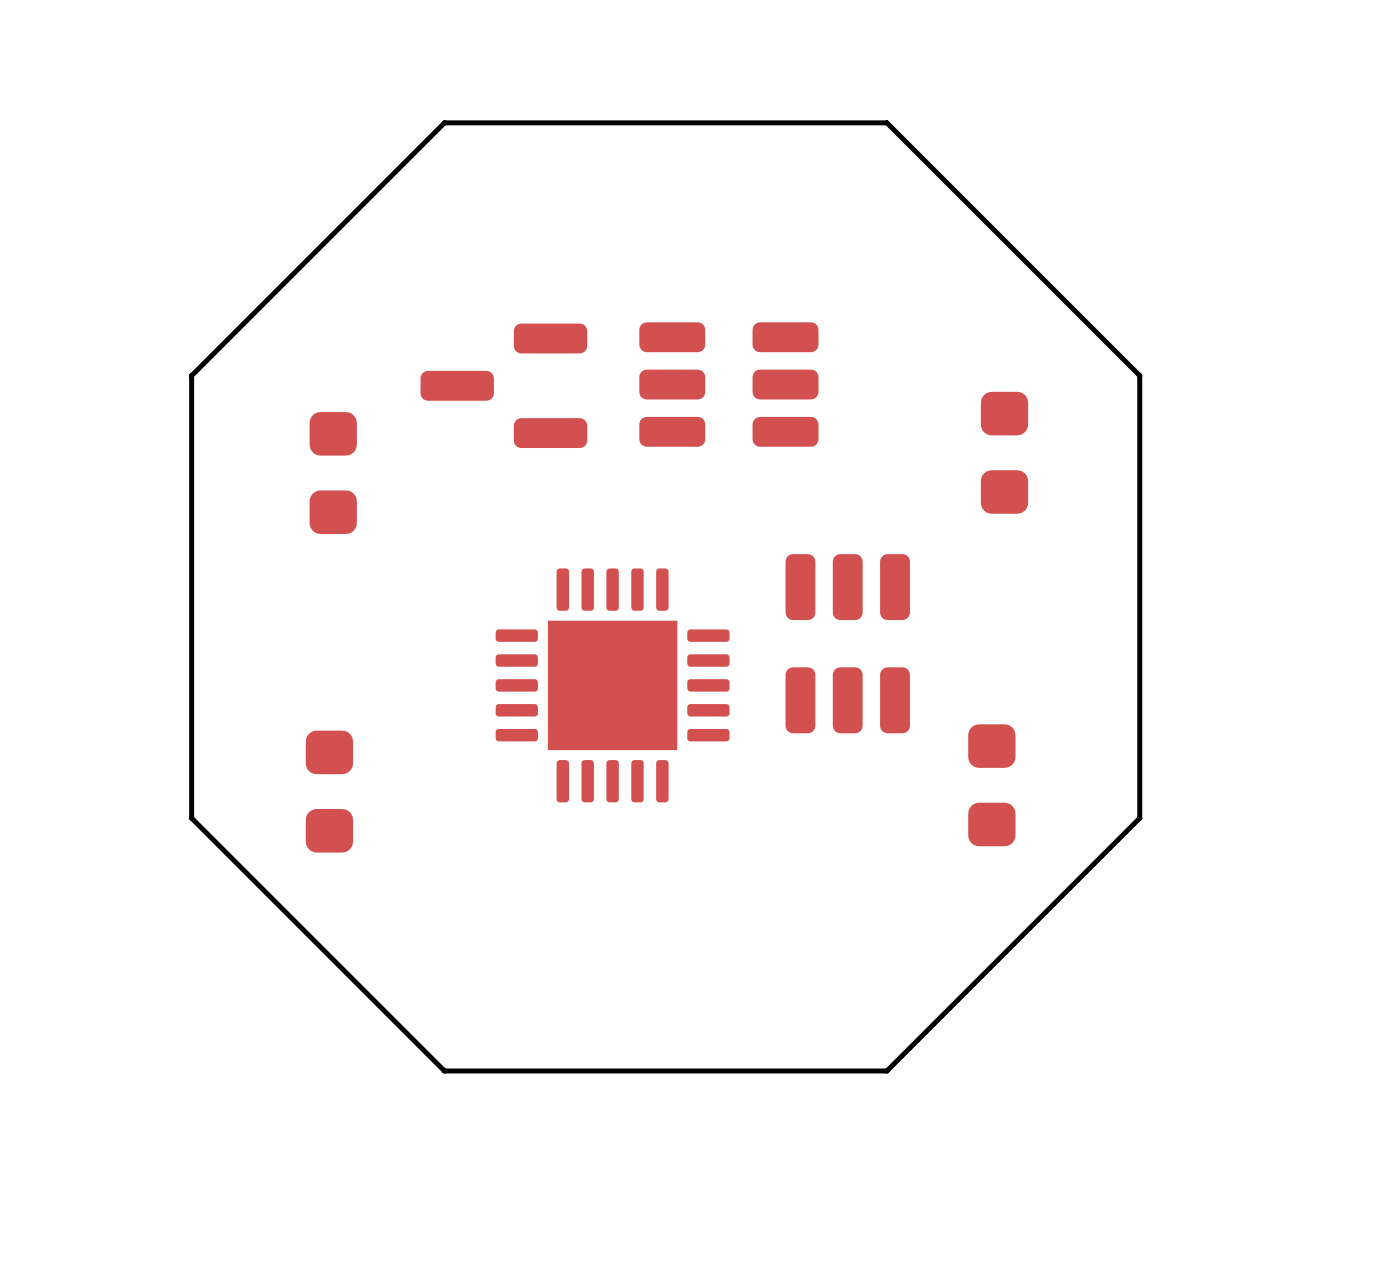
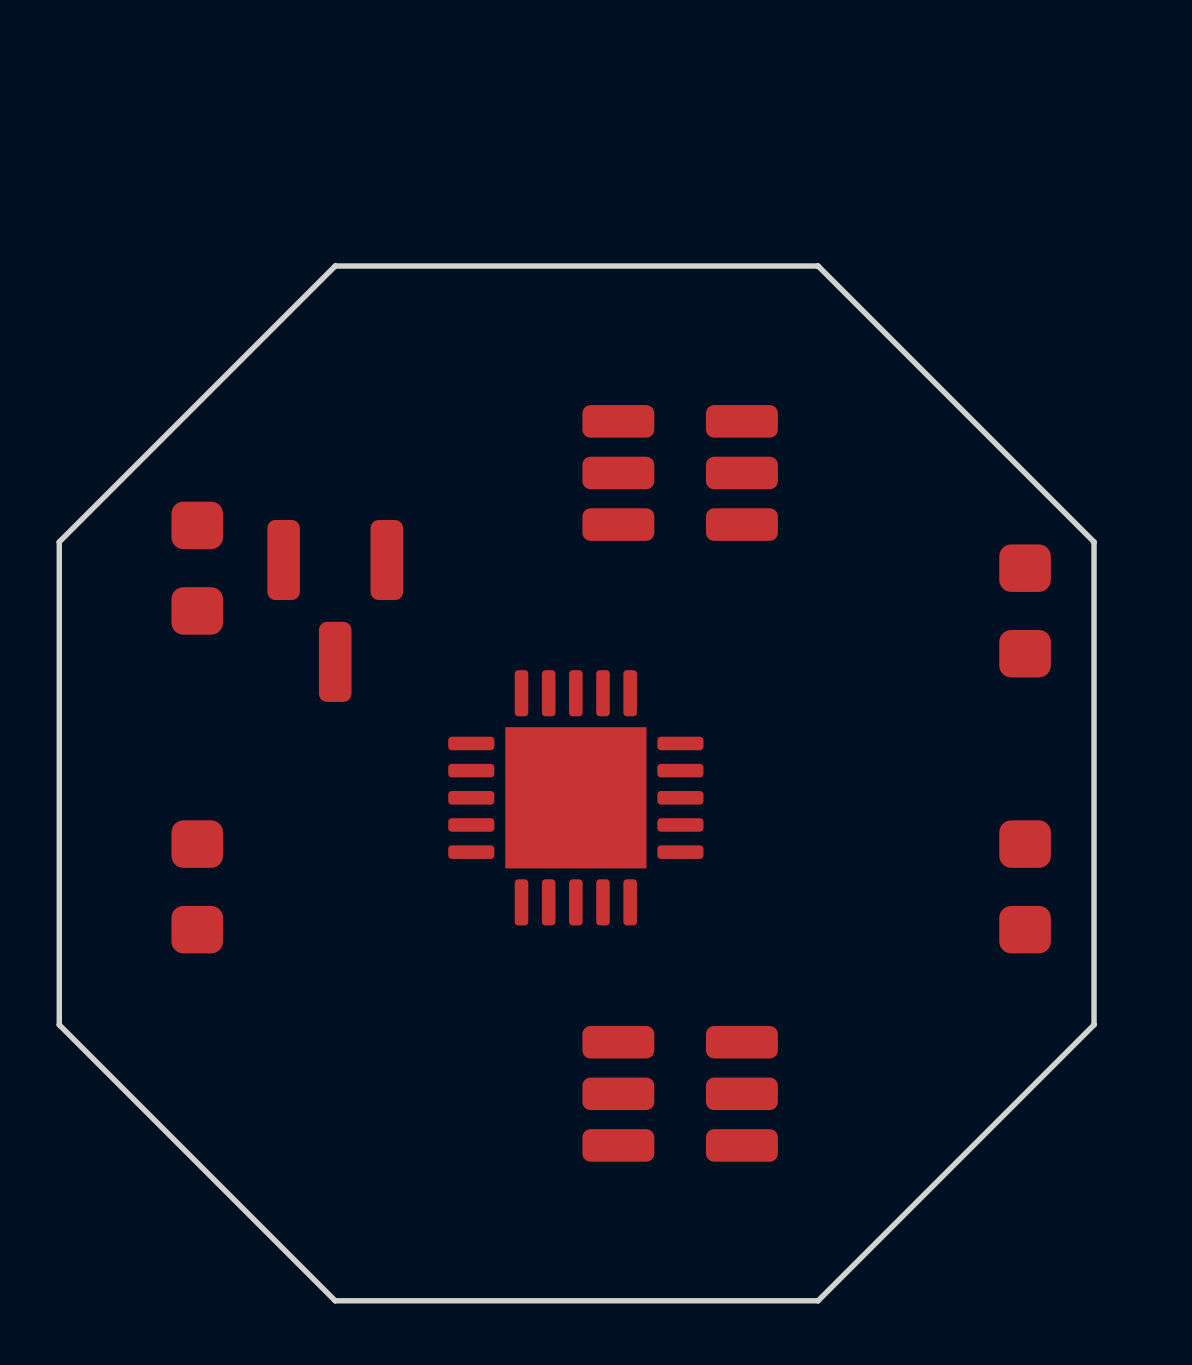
part position: (728, 384) -> (680, 472)
part rotation: 0° (503, 385) -> 90° counterclockwise (335, 610)
part position: (1004, 452) -> (1025, 610)
part position: (333, 473) -> (197, 568)
part: (847, 643) -> none
part position: (612, 685) -> (575, 797)
part: none -> (1025, 886)
part: (991, 785) -> none
part position: (329, 791) -> (197, 886)
part: none -> (680, 1093)

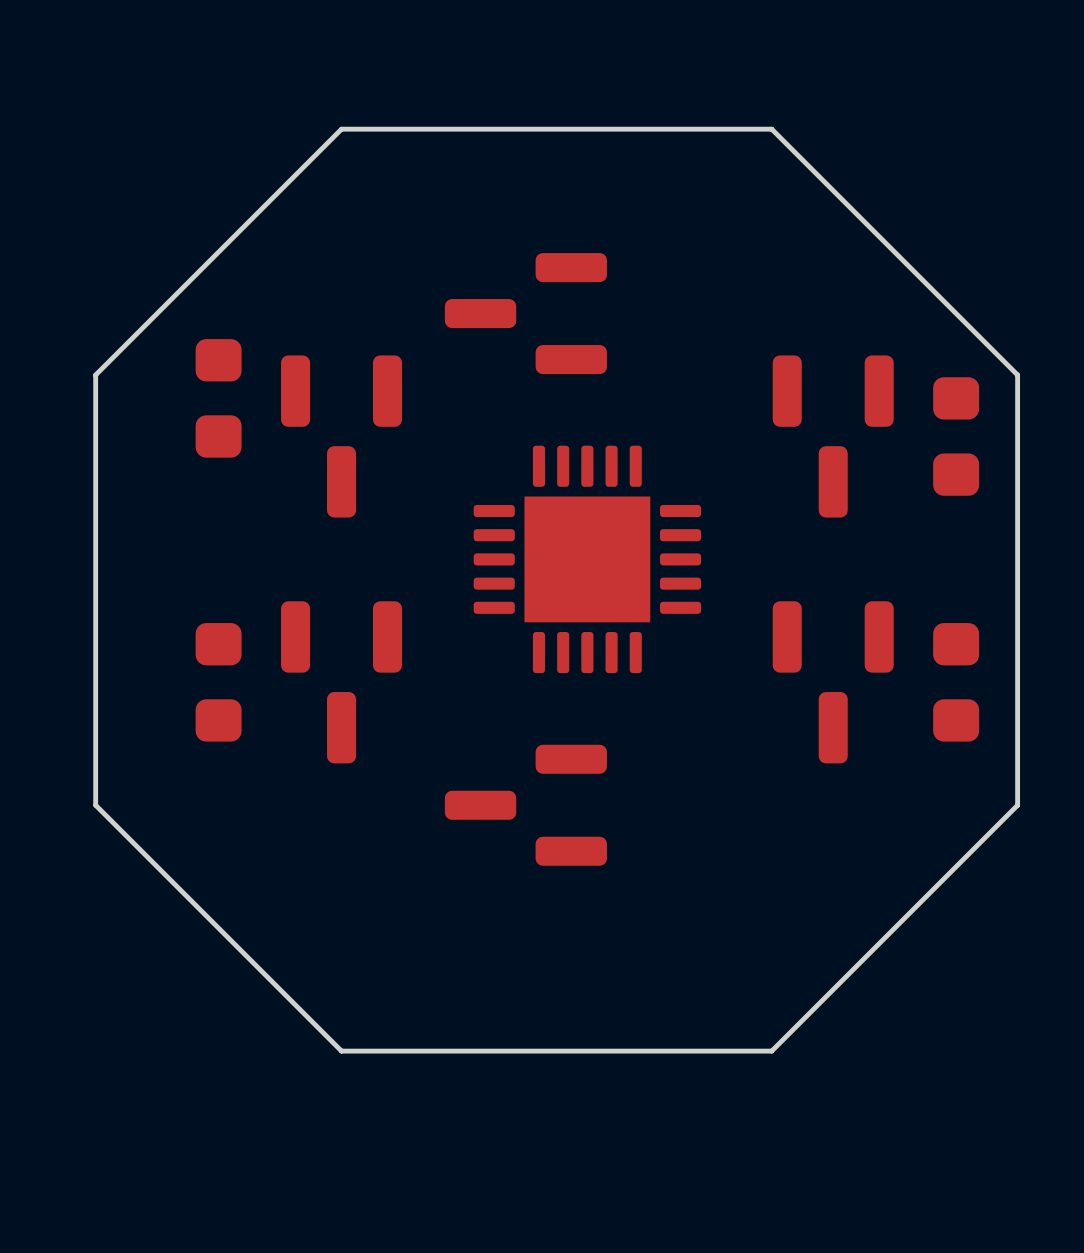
part: none -> (525, 313)
part: (680, 472) -> none
part: none -> (833, 436)
part position: (575, 797) -> (587, 559)
part: none -> (341, 682)
part: none -> (833, 682)
part: none -> (525, 805)
part: (680, 1093) -> none

